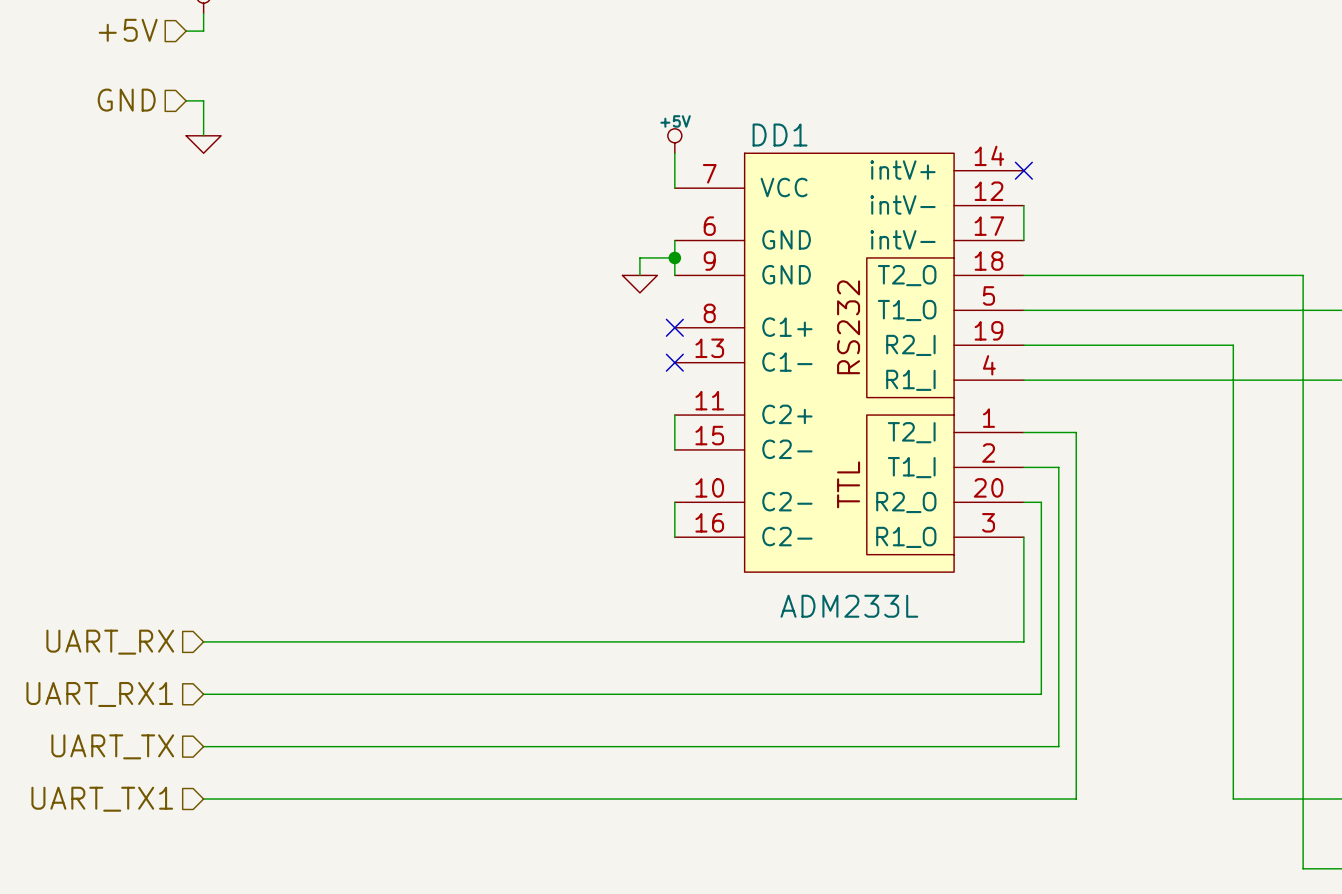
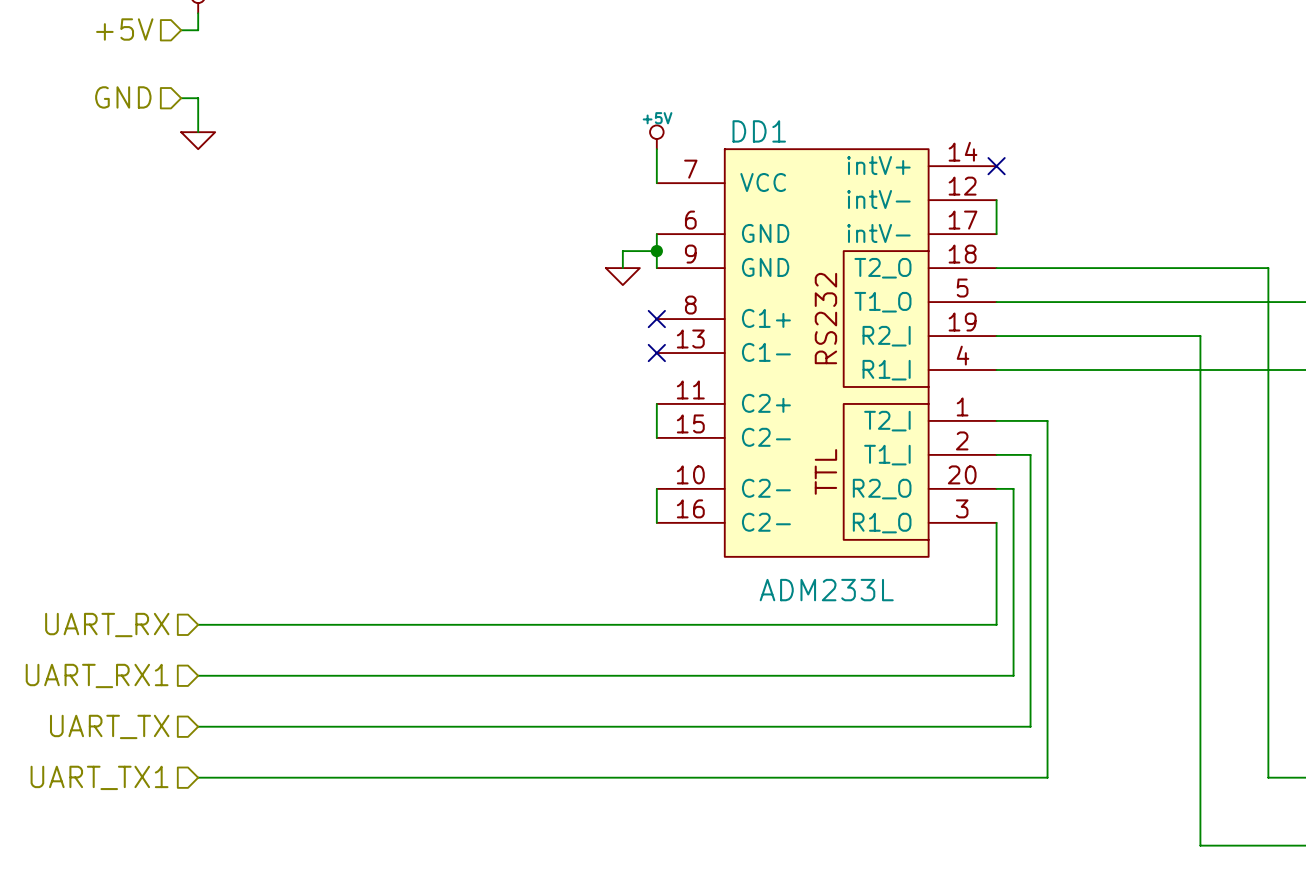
wire: (1233, 799) (1303, 799) (1303, 868) -> (1200, 777) (1200, 845) (1268, 845)

